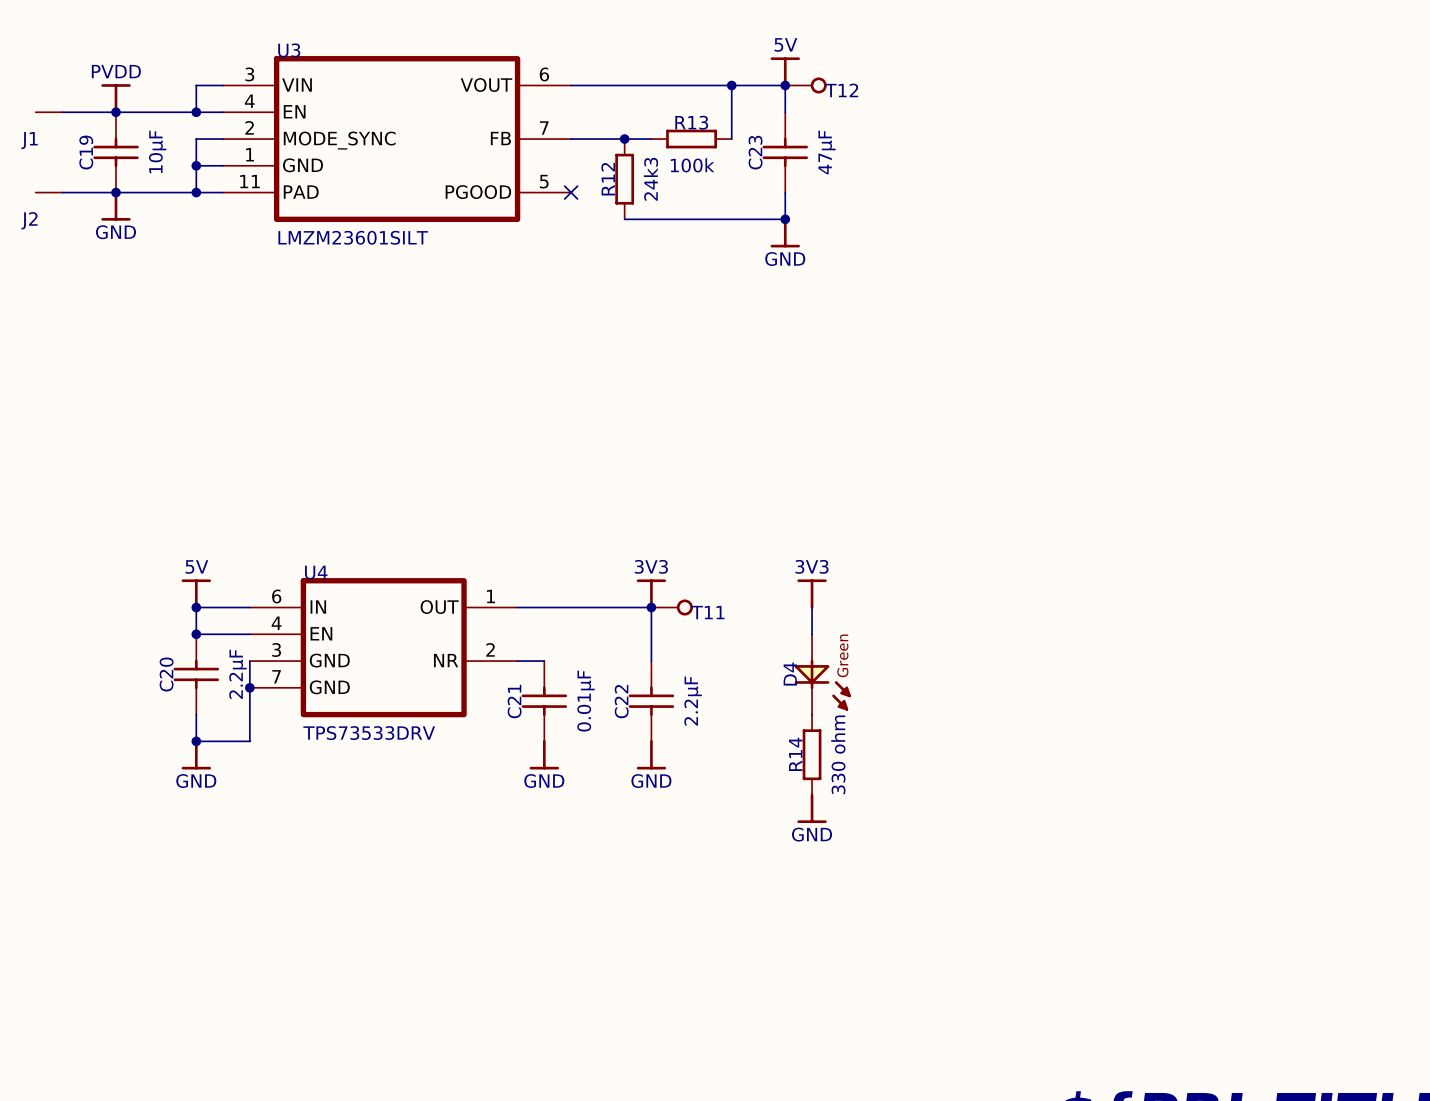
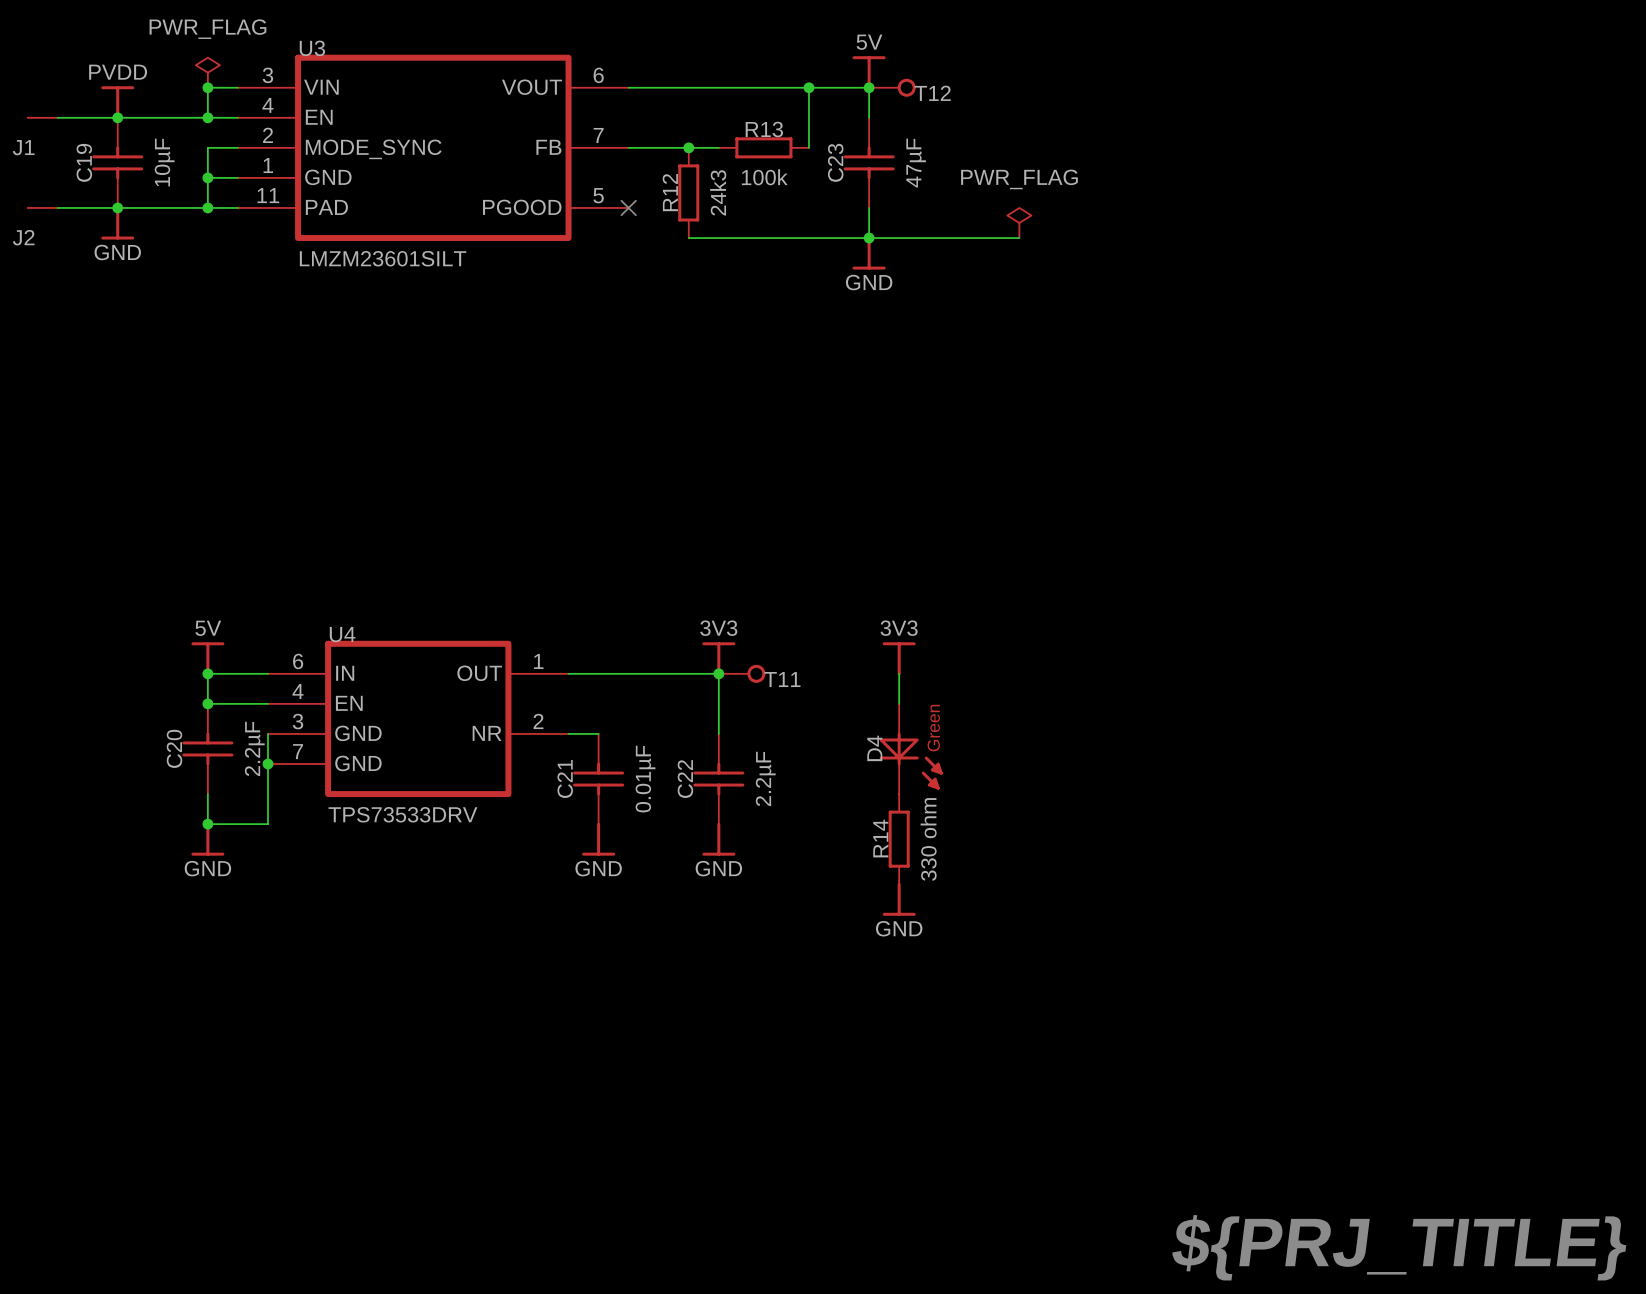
power symbol: none -> PWR_FLAG (207, 72)
junction: none -> (207, 87)
power symbol: none -> PWR_FLAG (1019, 223)
wire: none -> (869, 238) (1019, 238)

